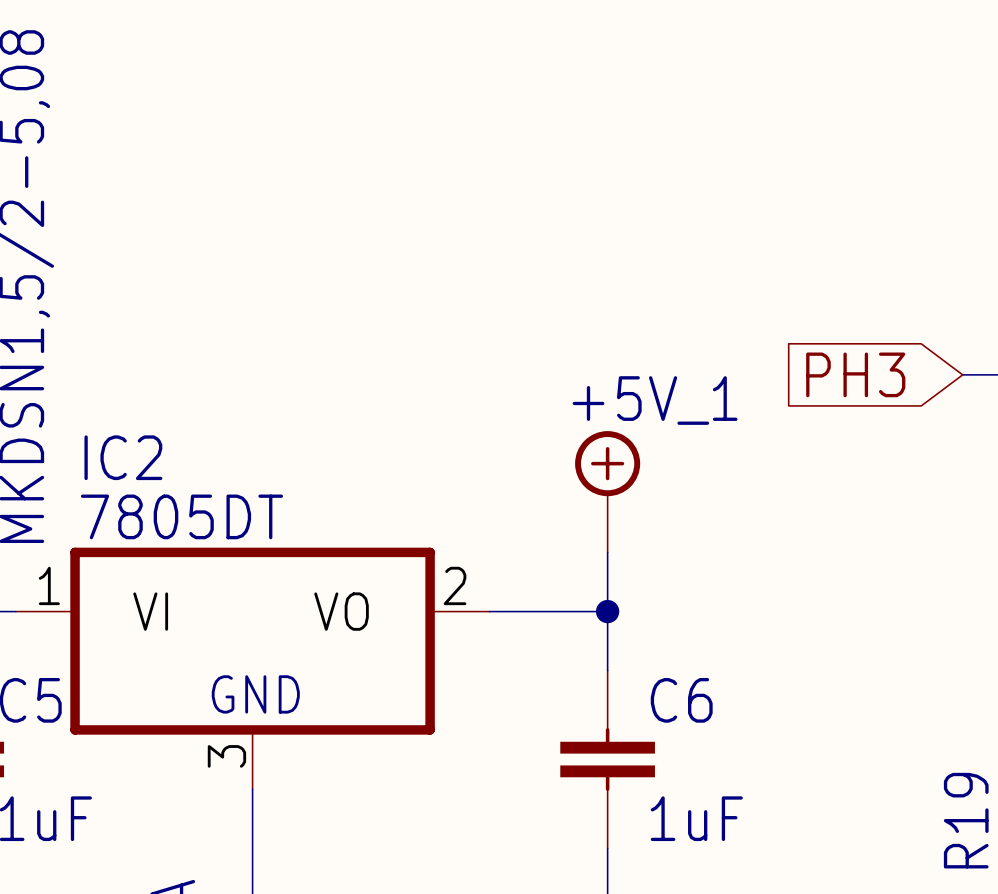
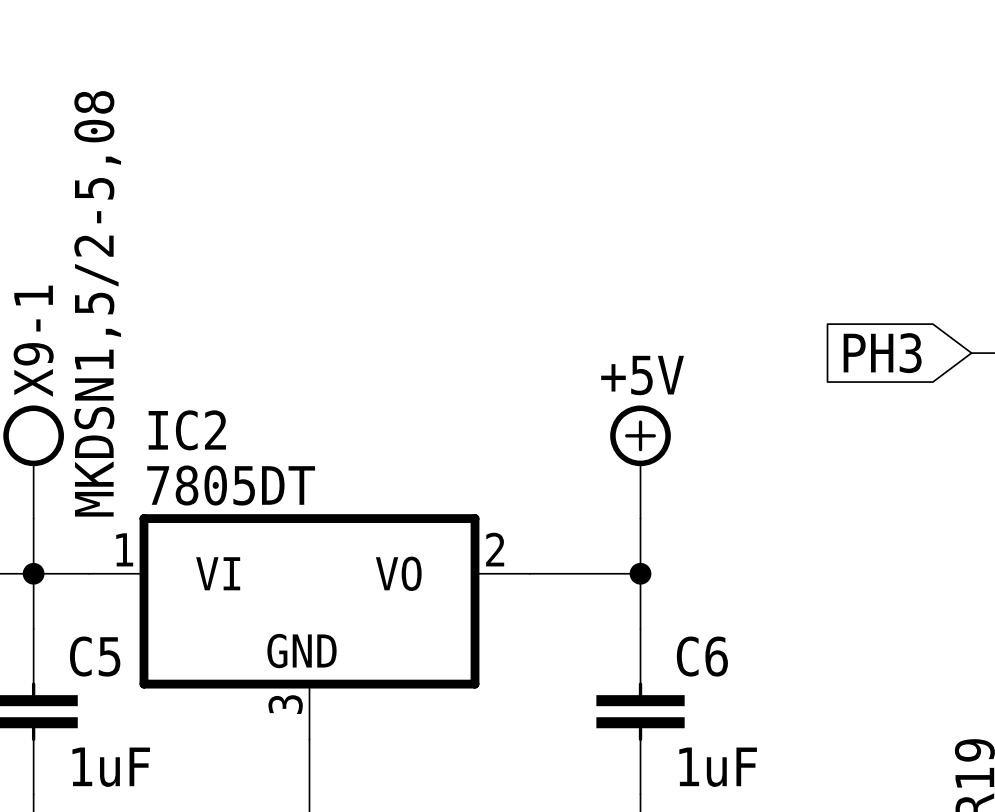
power symbol: +5V_1 (607, 491) -> +5V (640, 462)

